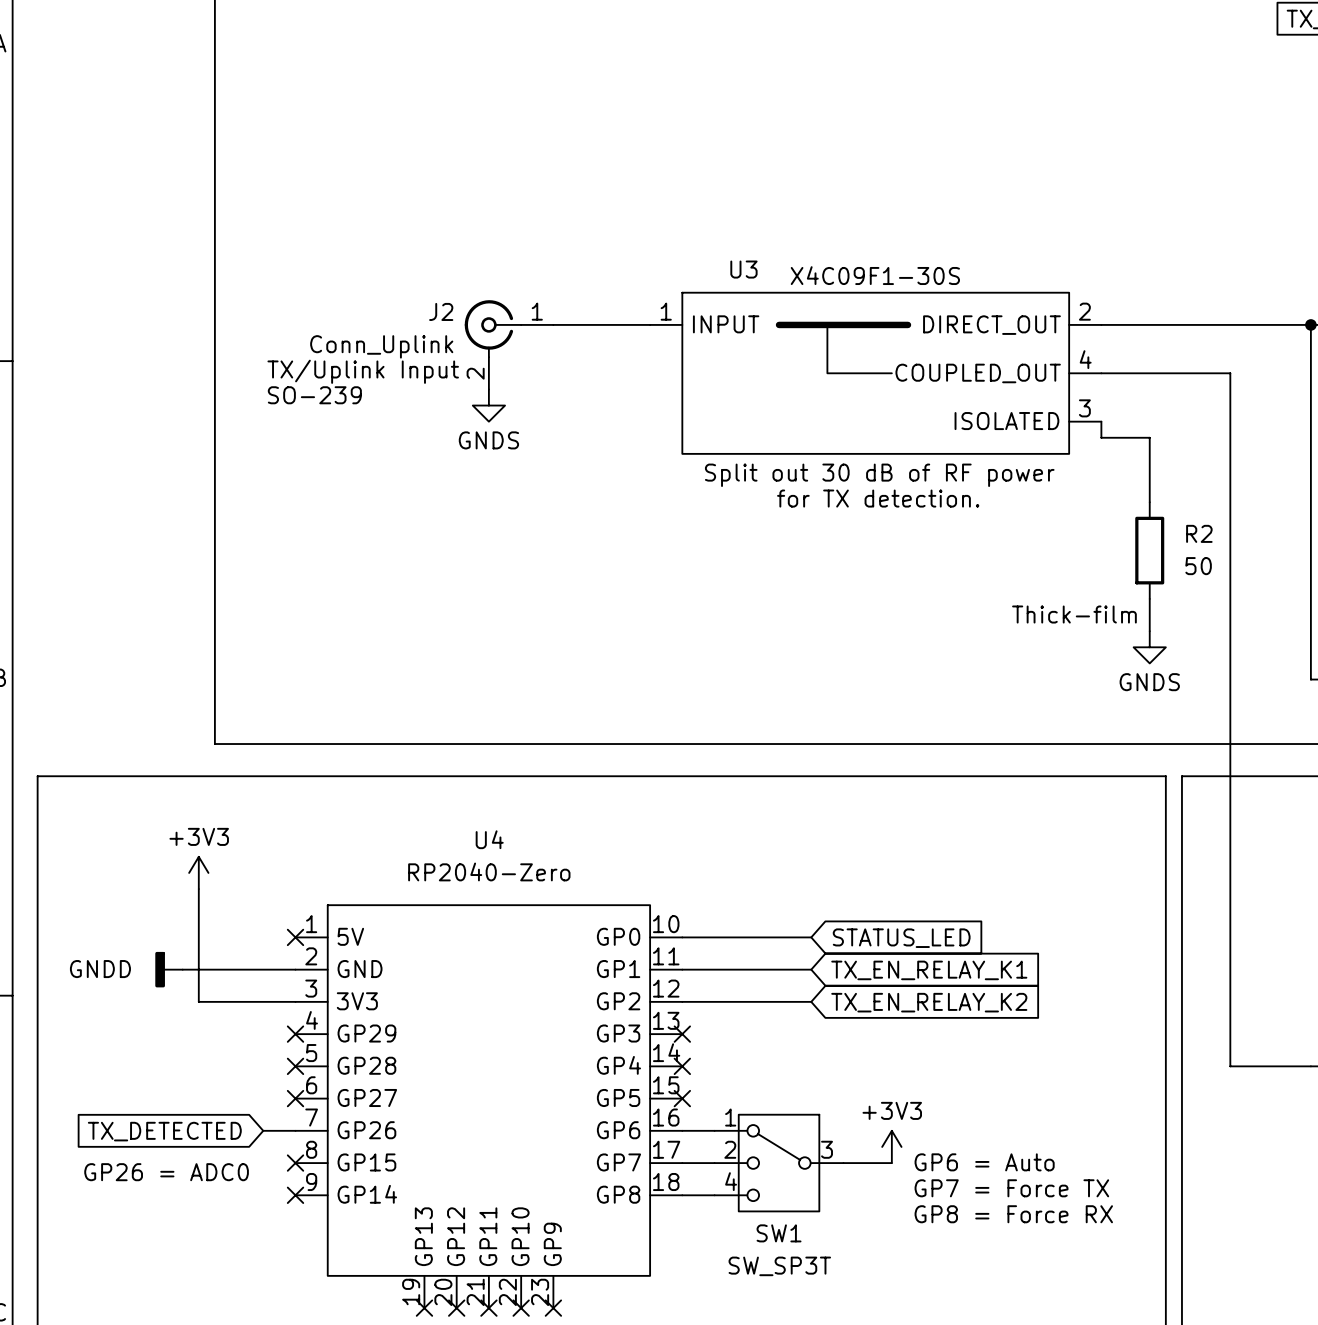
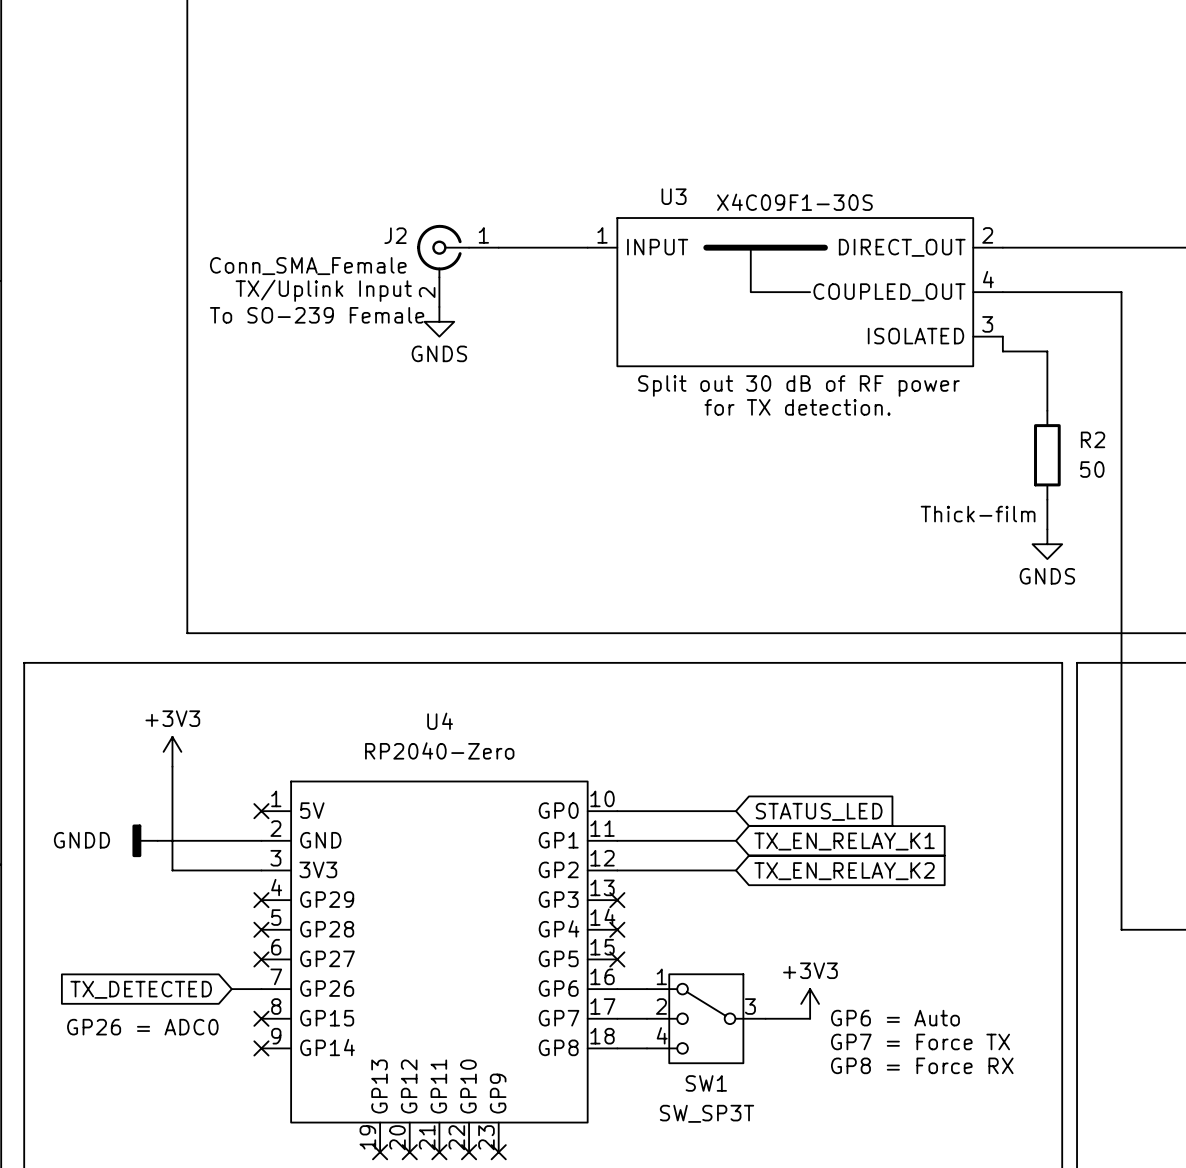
J2 value: Conn_Uplink (381, 346) -> Conn_SMA_Female (308, 266)
J2 text: SO-239 (314, 395) -> To SO-239 Female (317, 315)

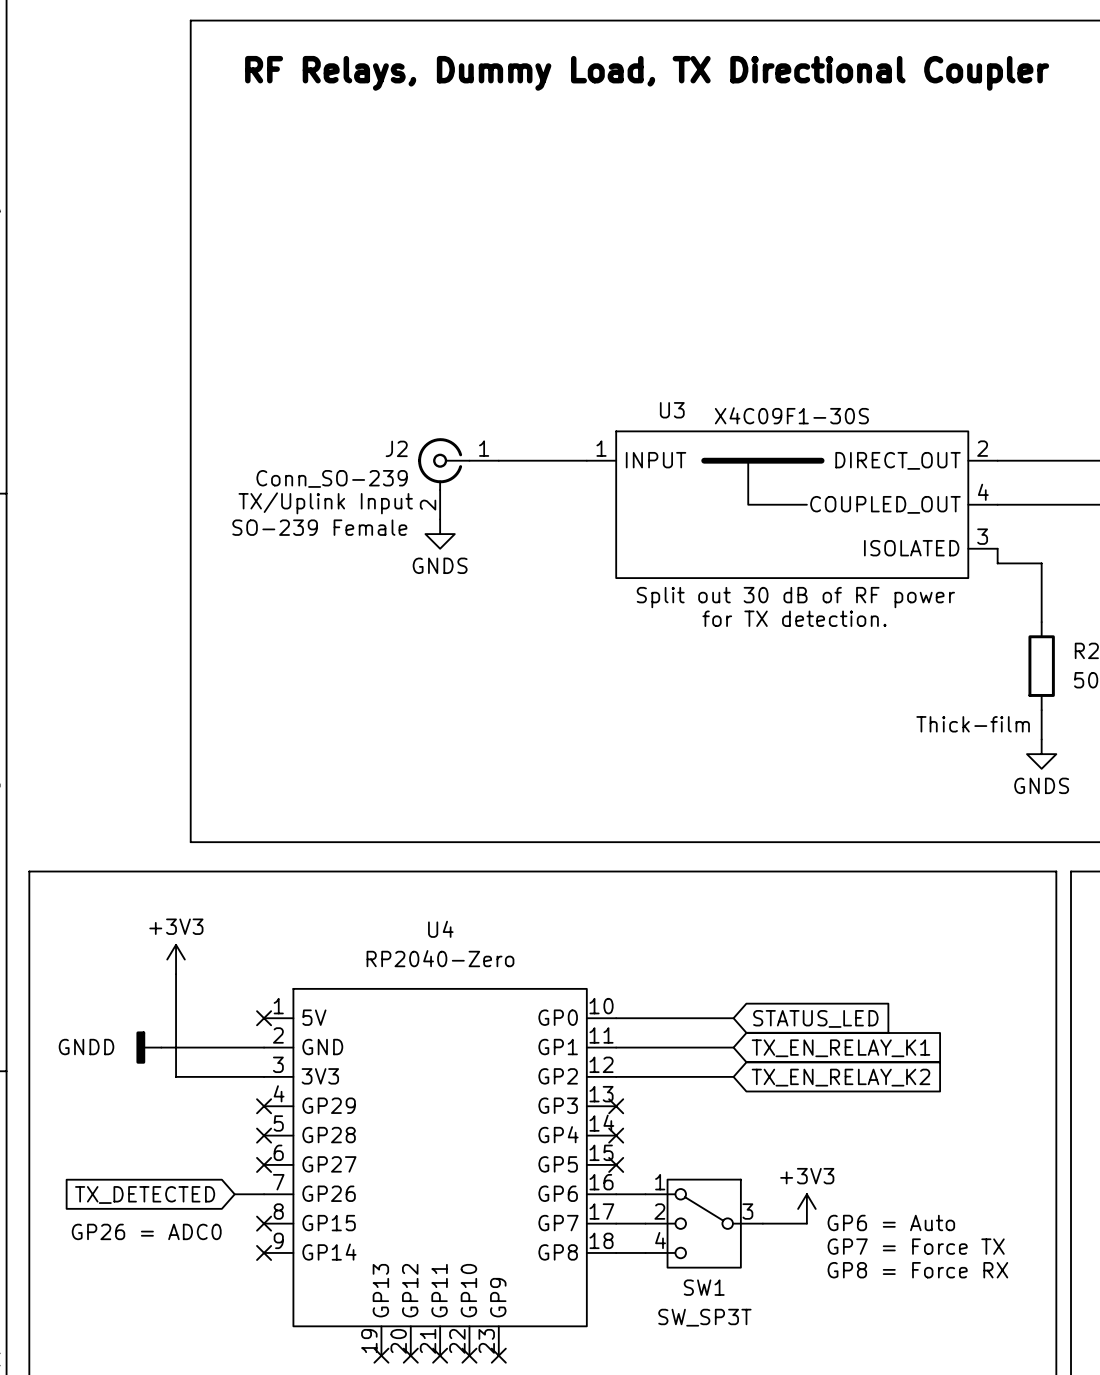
J2 value: Conn_SMA_Female (308, 266) -> Conn_SO-239 (332, 478)
J2 text: To SO-239 Female (317, 315) -> SO-239 Female (319, 527)

